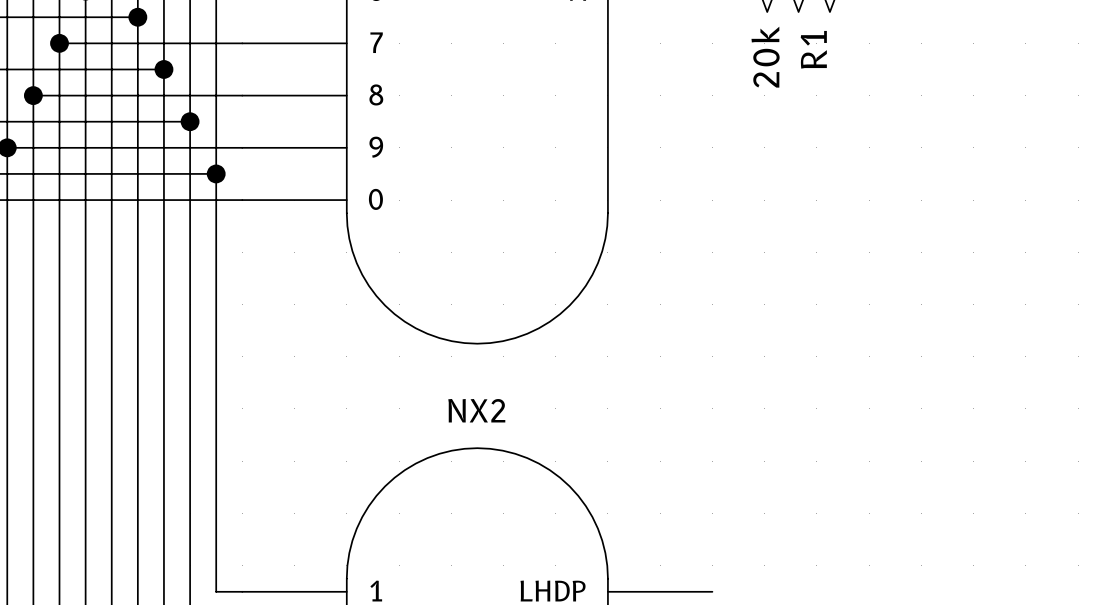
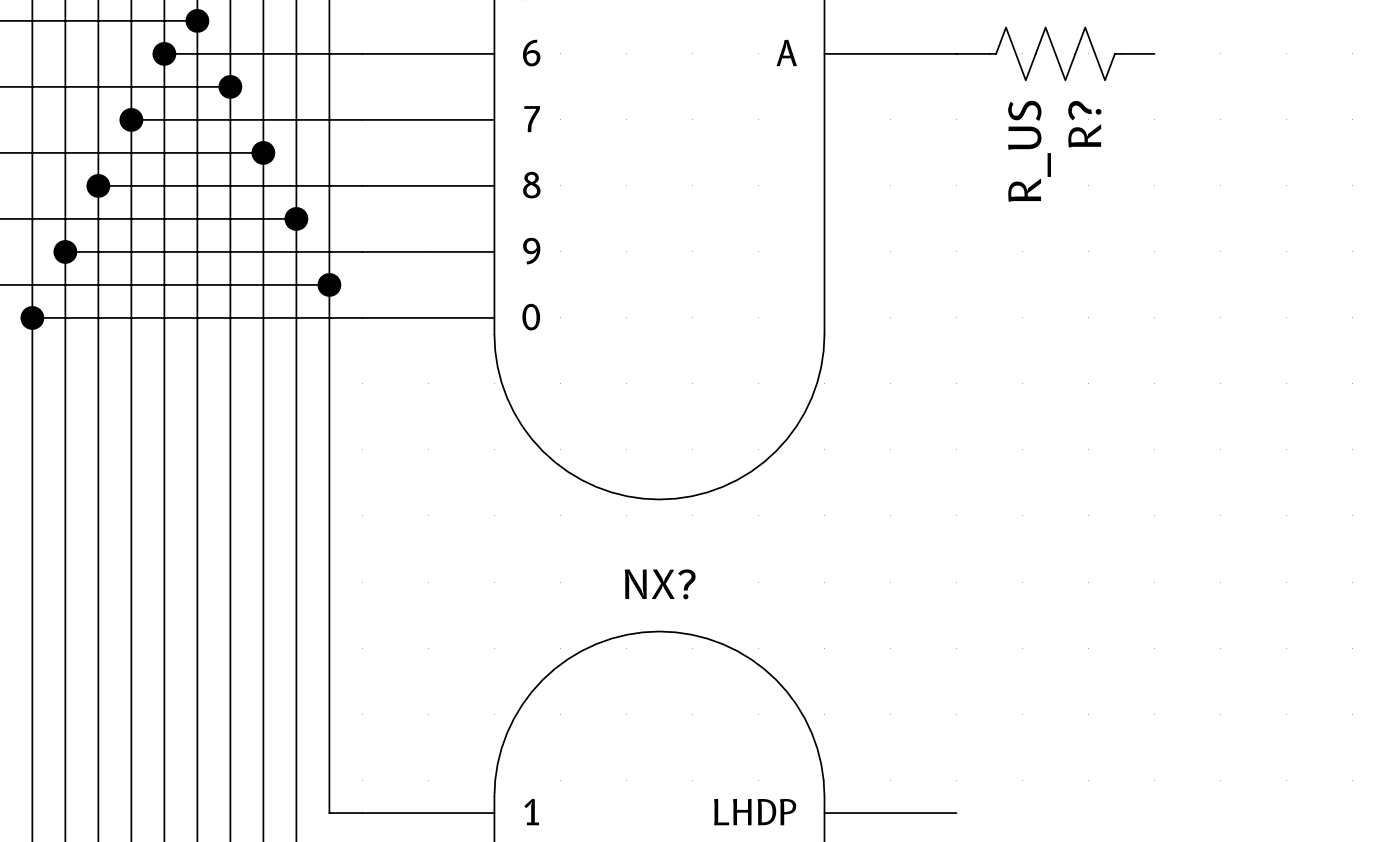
R1 name: R1 (813, 49) -> R? (1084, 124)
R1 value: 20k (765, 57) -> R_US (1029, 151)
NX2 name: NX2 (476, 410) -> NX? (660, 584)

